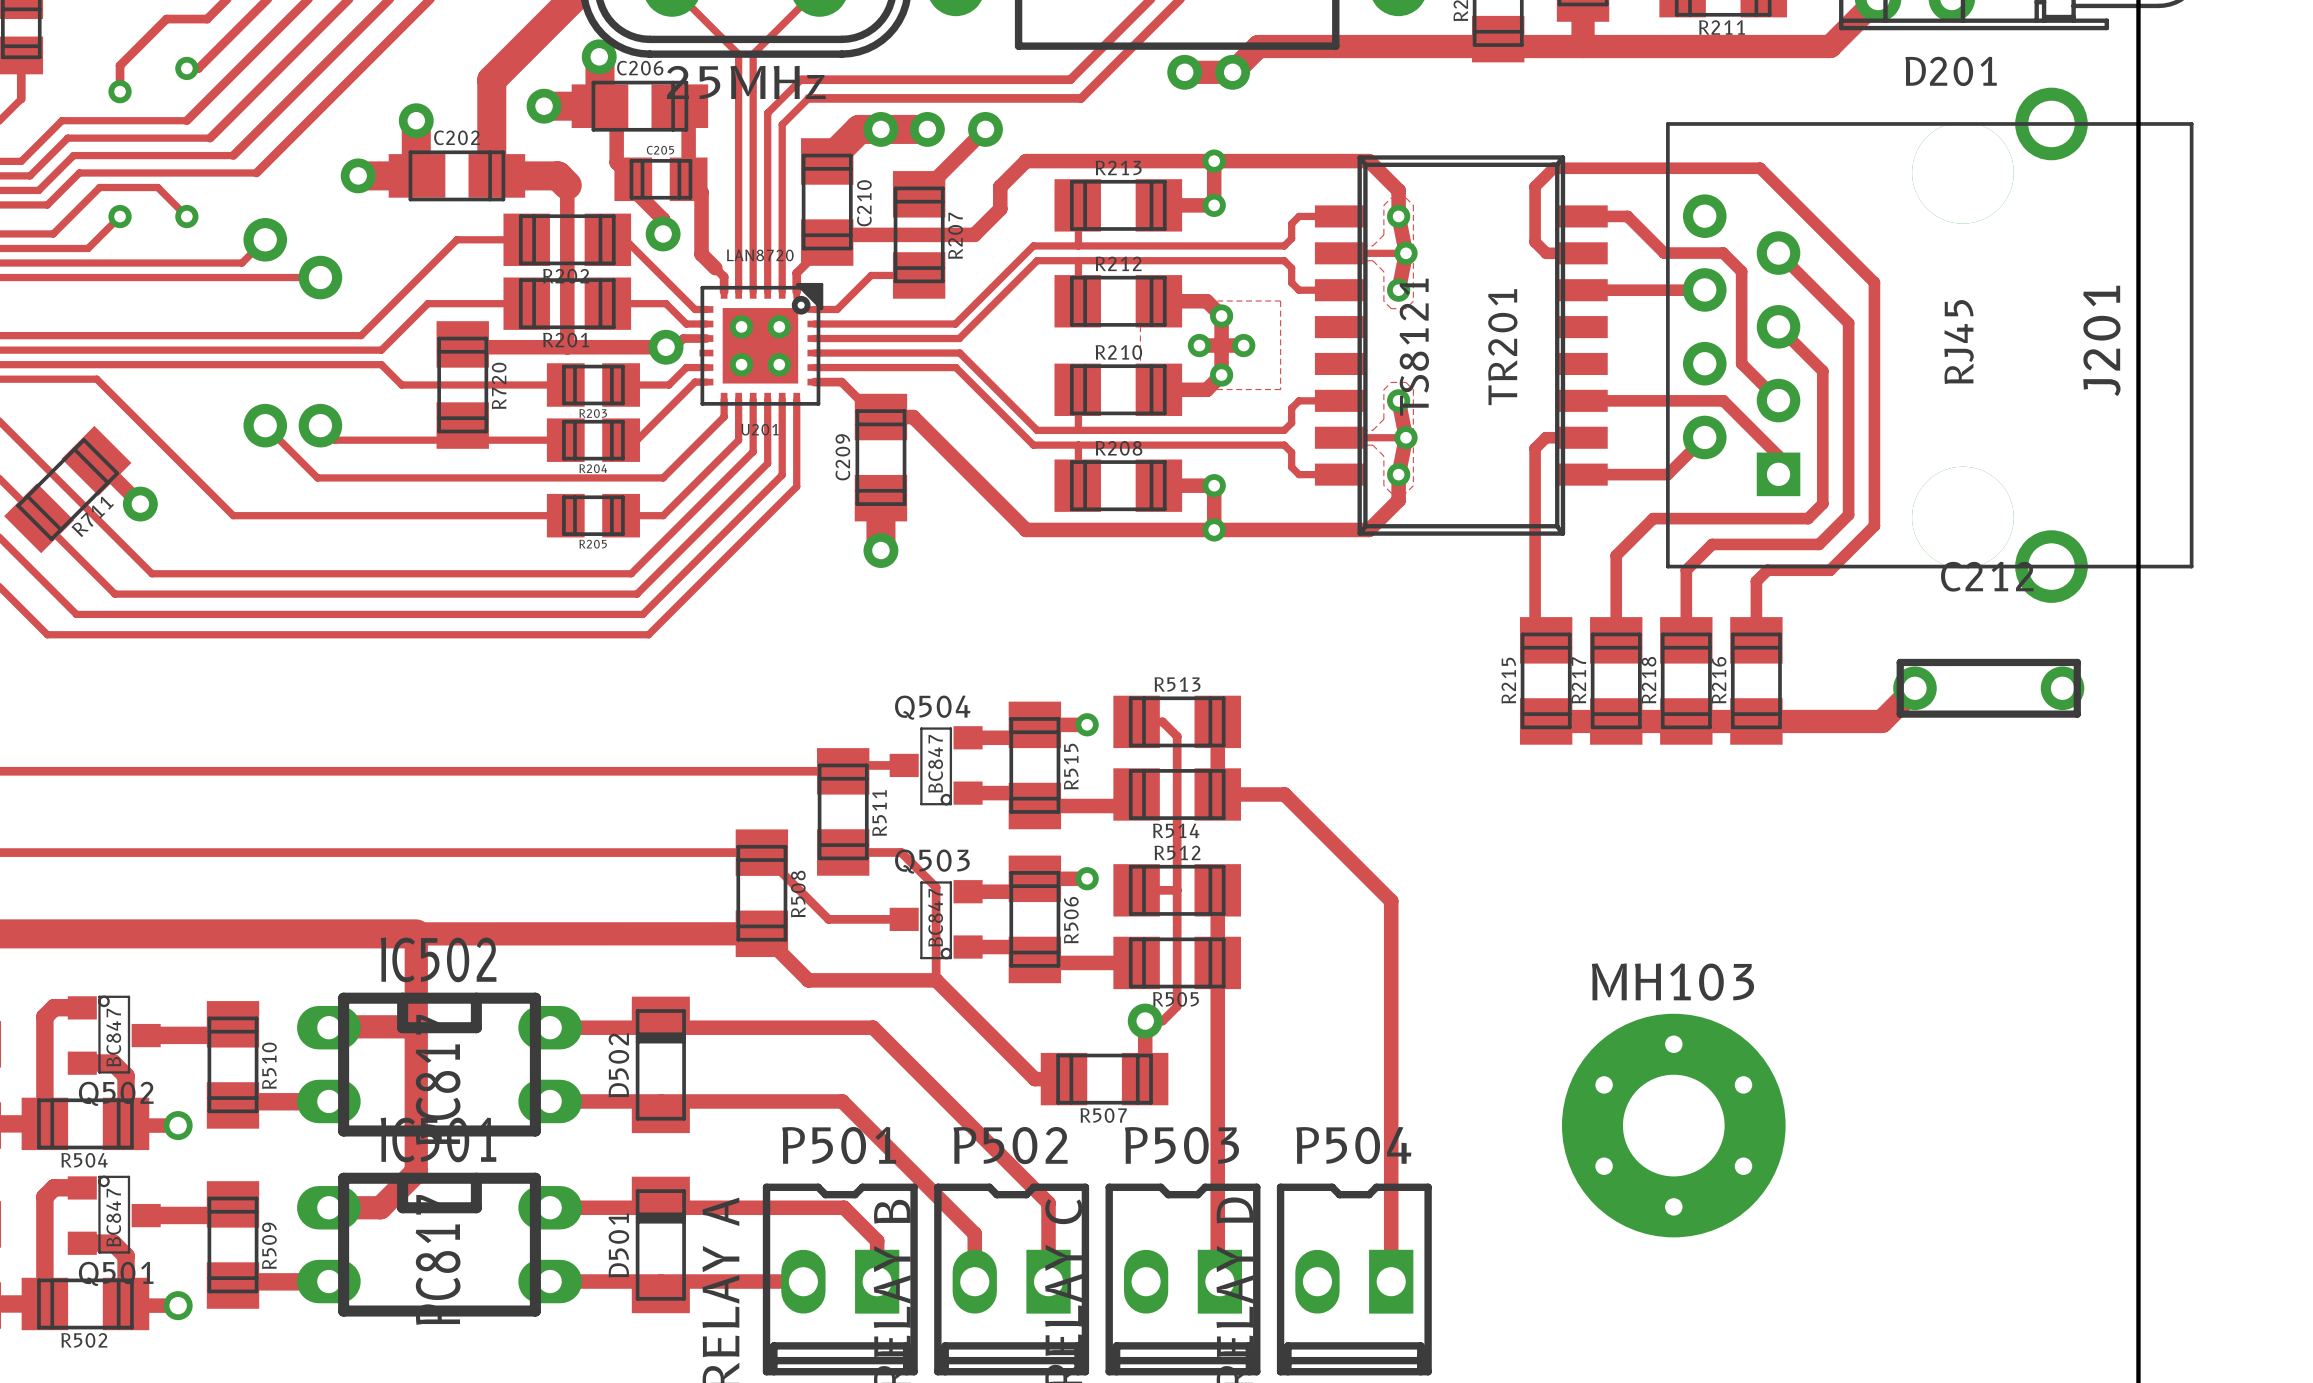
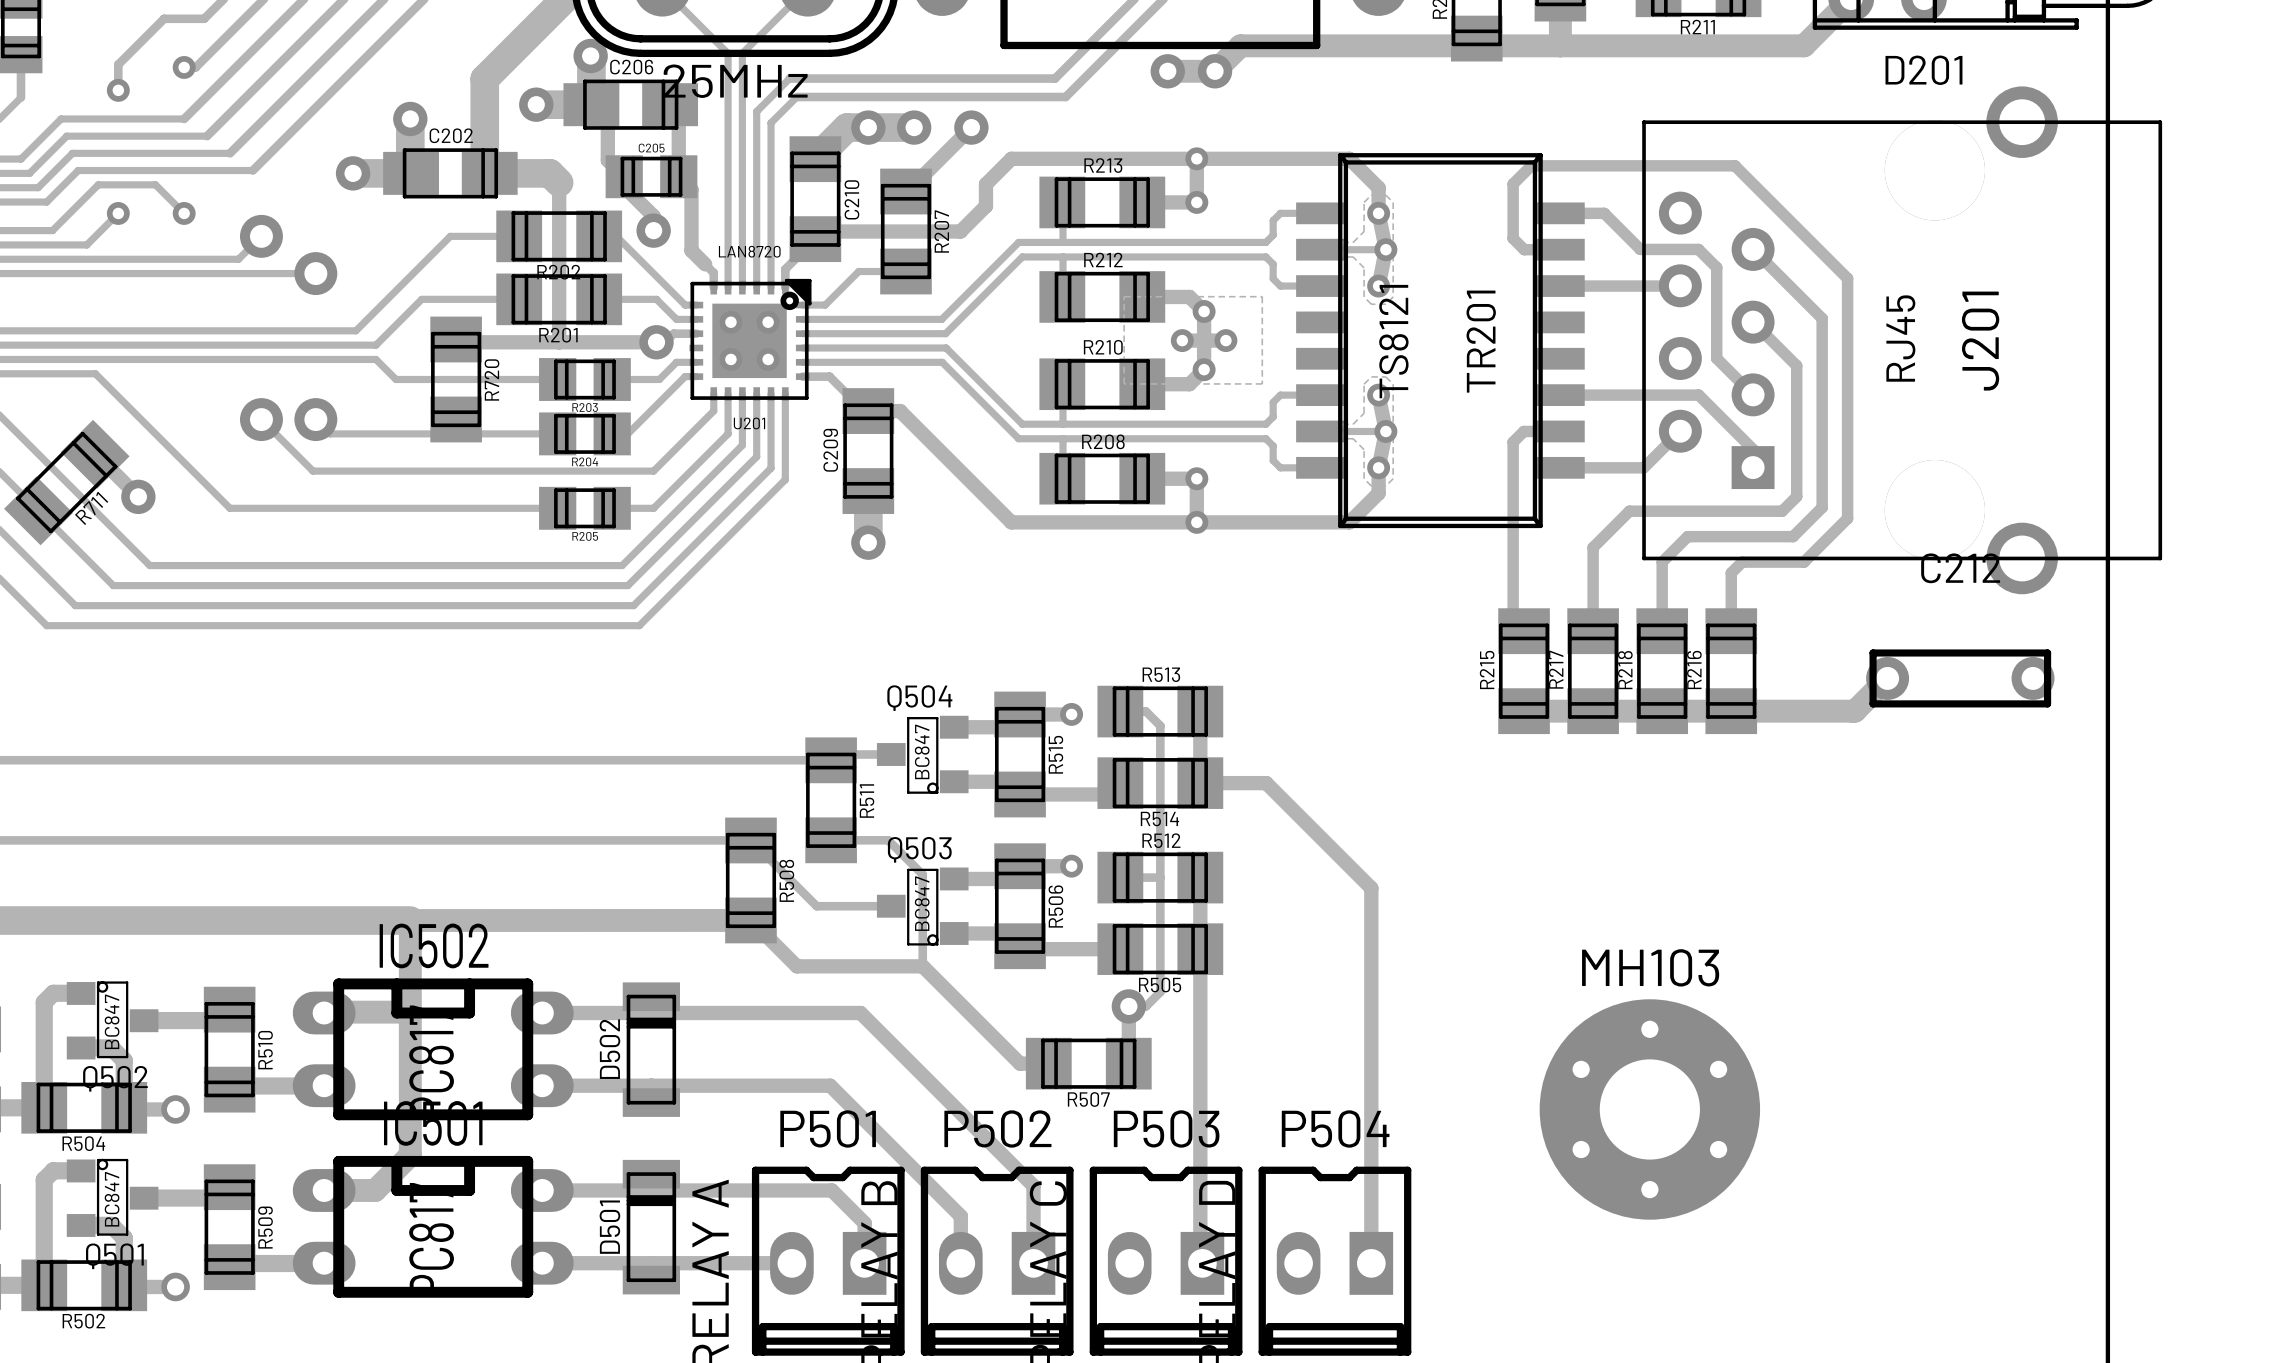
J201 name position: J201 (2101, 340) -> J201 (1980, 341)
J201 value position: RJ45 (1959, 342) -> RJ45 (1900, 338)

